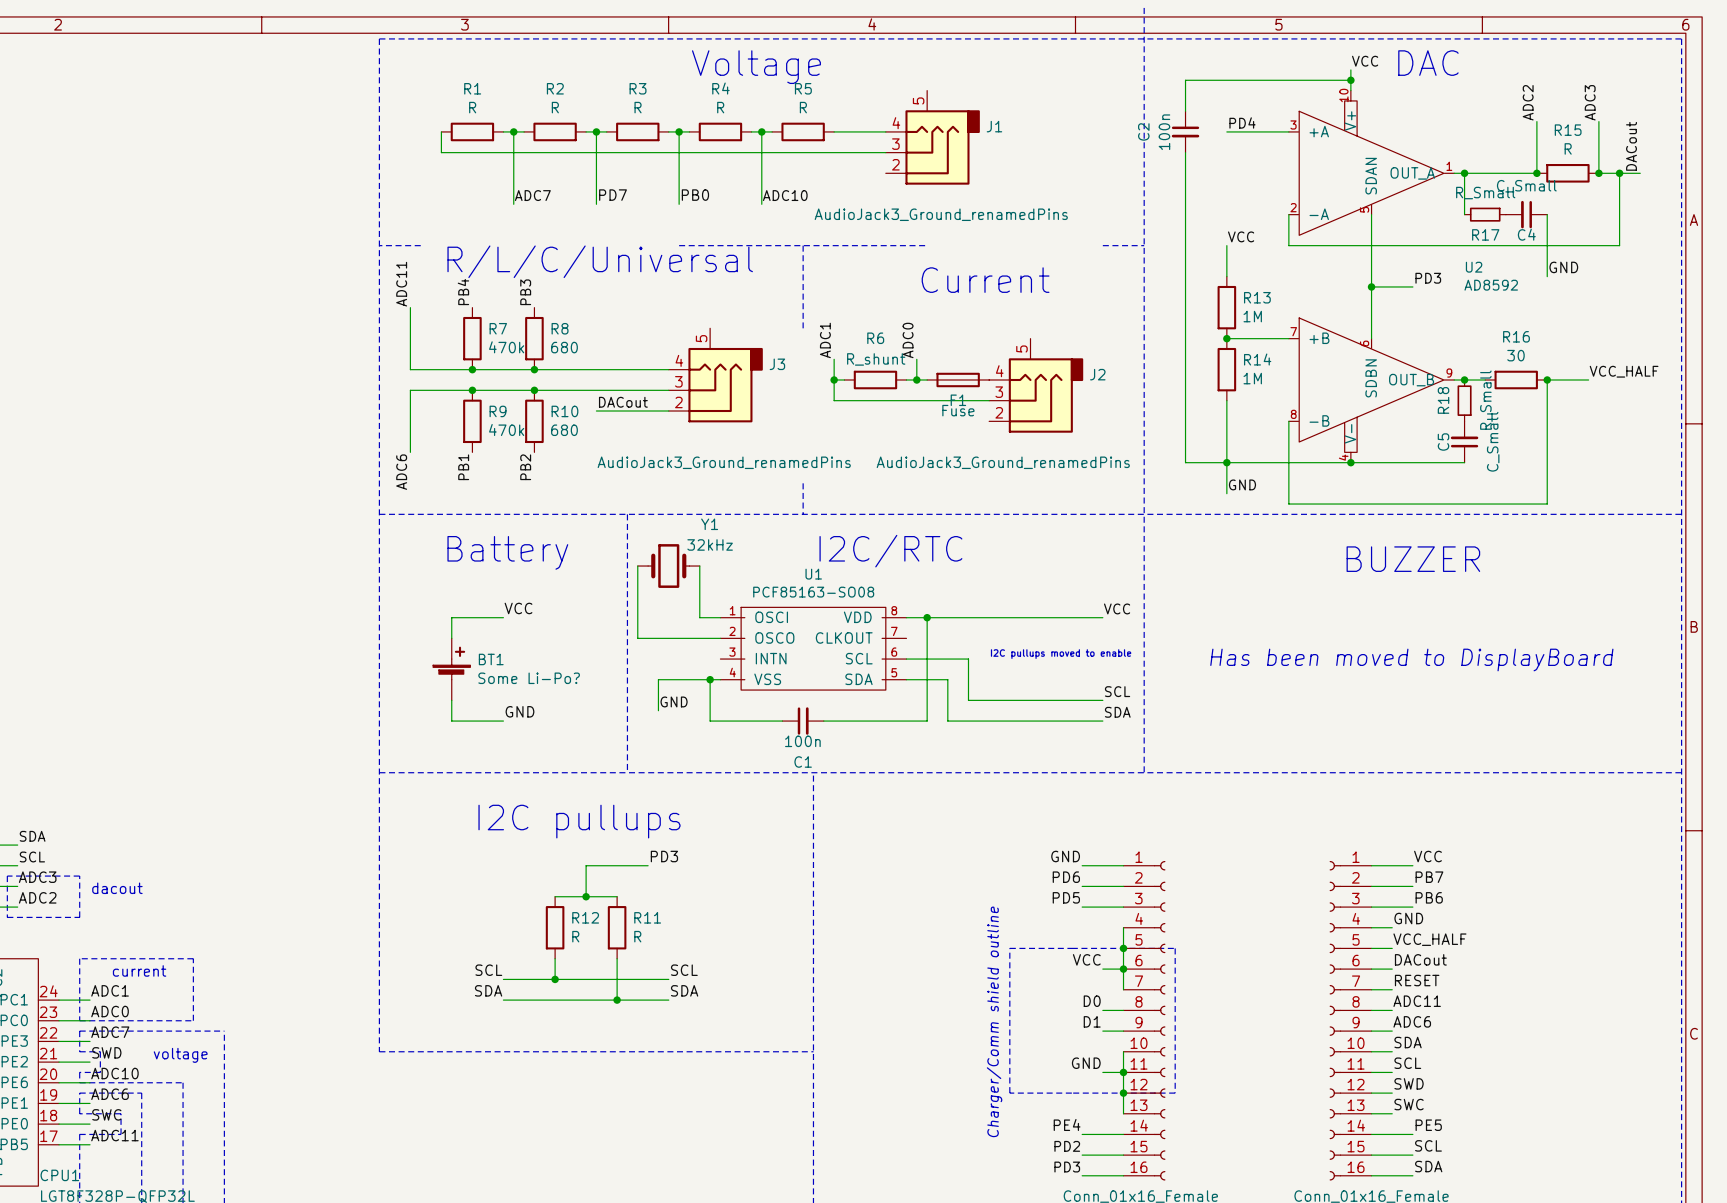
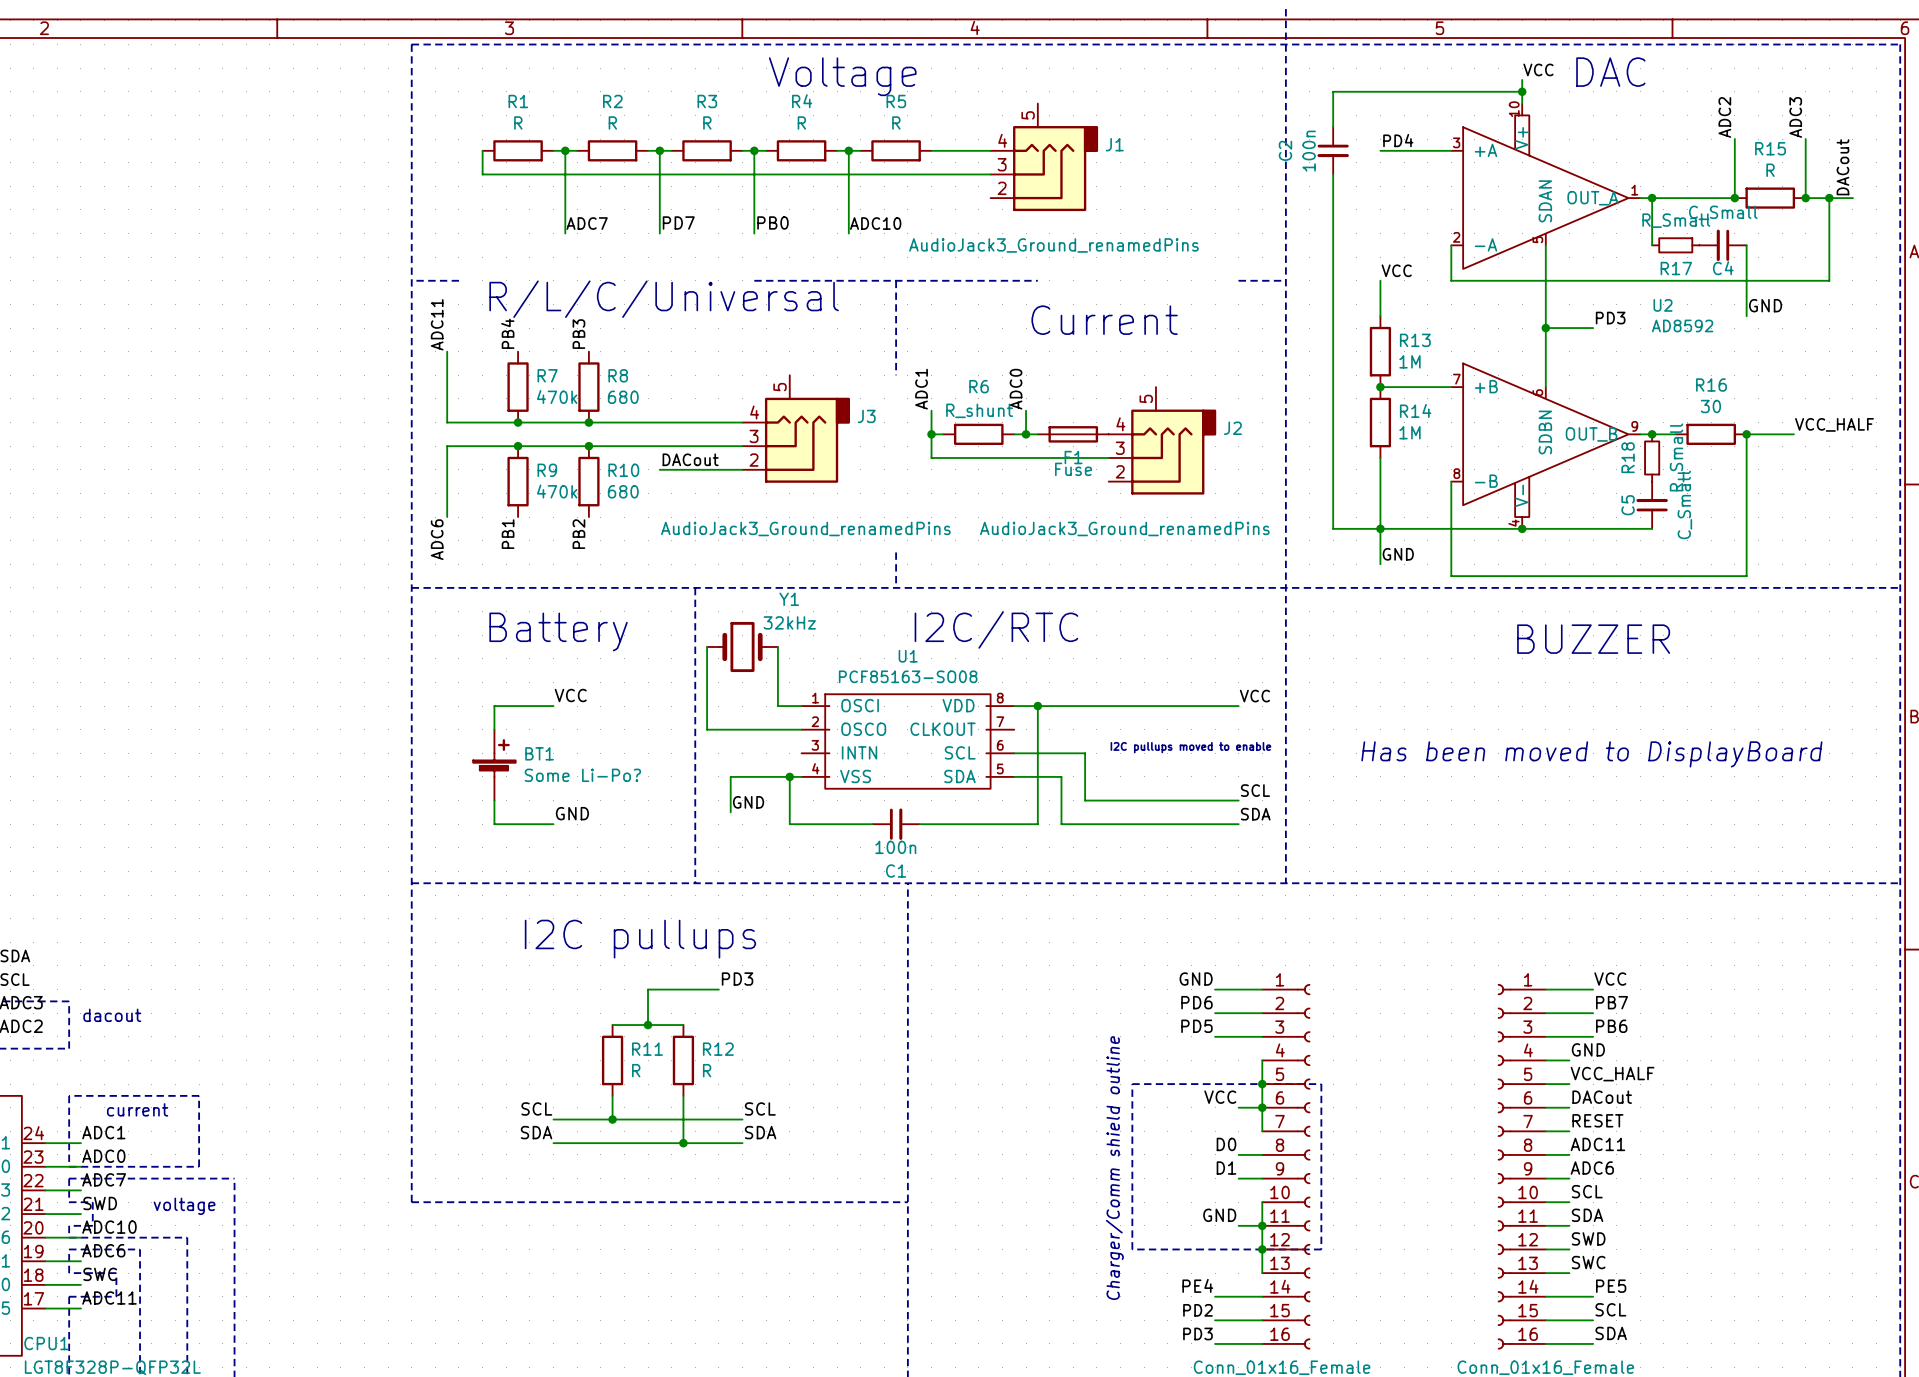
R12 name: R12 (585, 917) -> R11 (647, 1049)
R11 name: R11 (647, 917) -> R12 (718, 1049)
label: SDA (1408, 1042) -> SCL (1587, 1191)
label: SCL (1407, 1063) -> SDA (1587, 1215)

